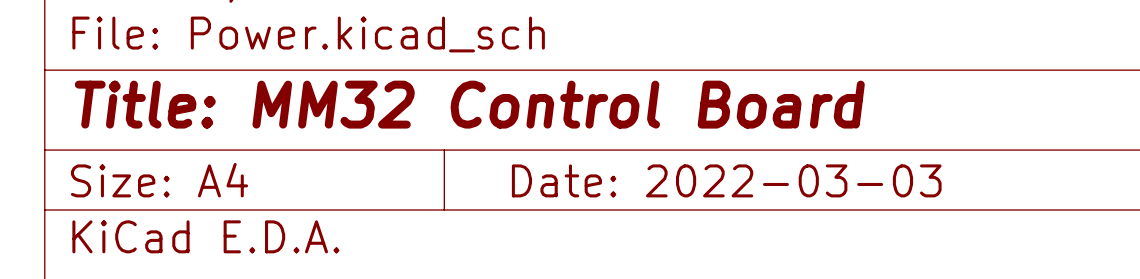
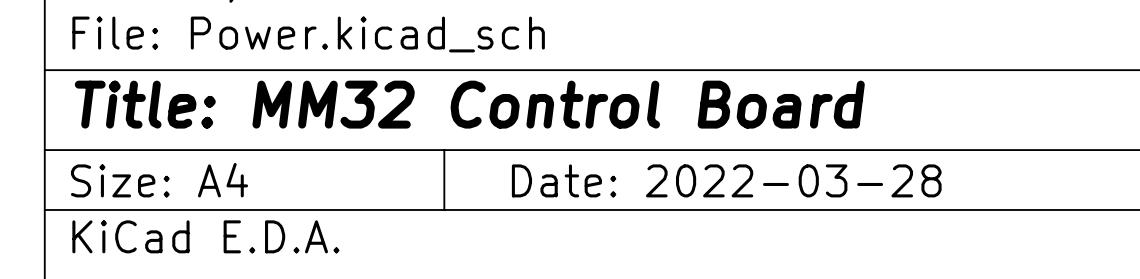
title block: Date: 2022-03-03 (726, 180) -> Date: 2022-03-28 (726, 180)

